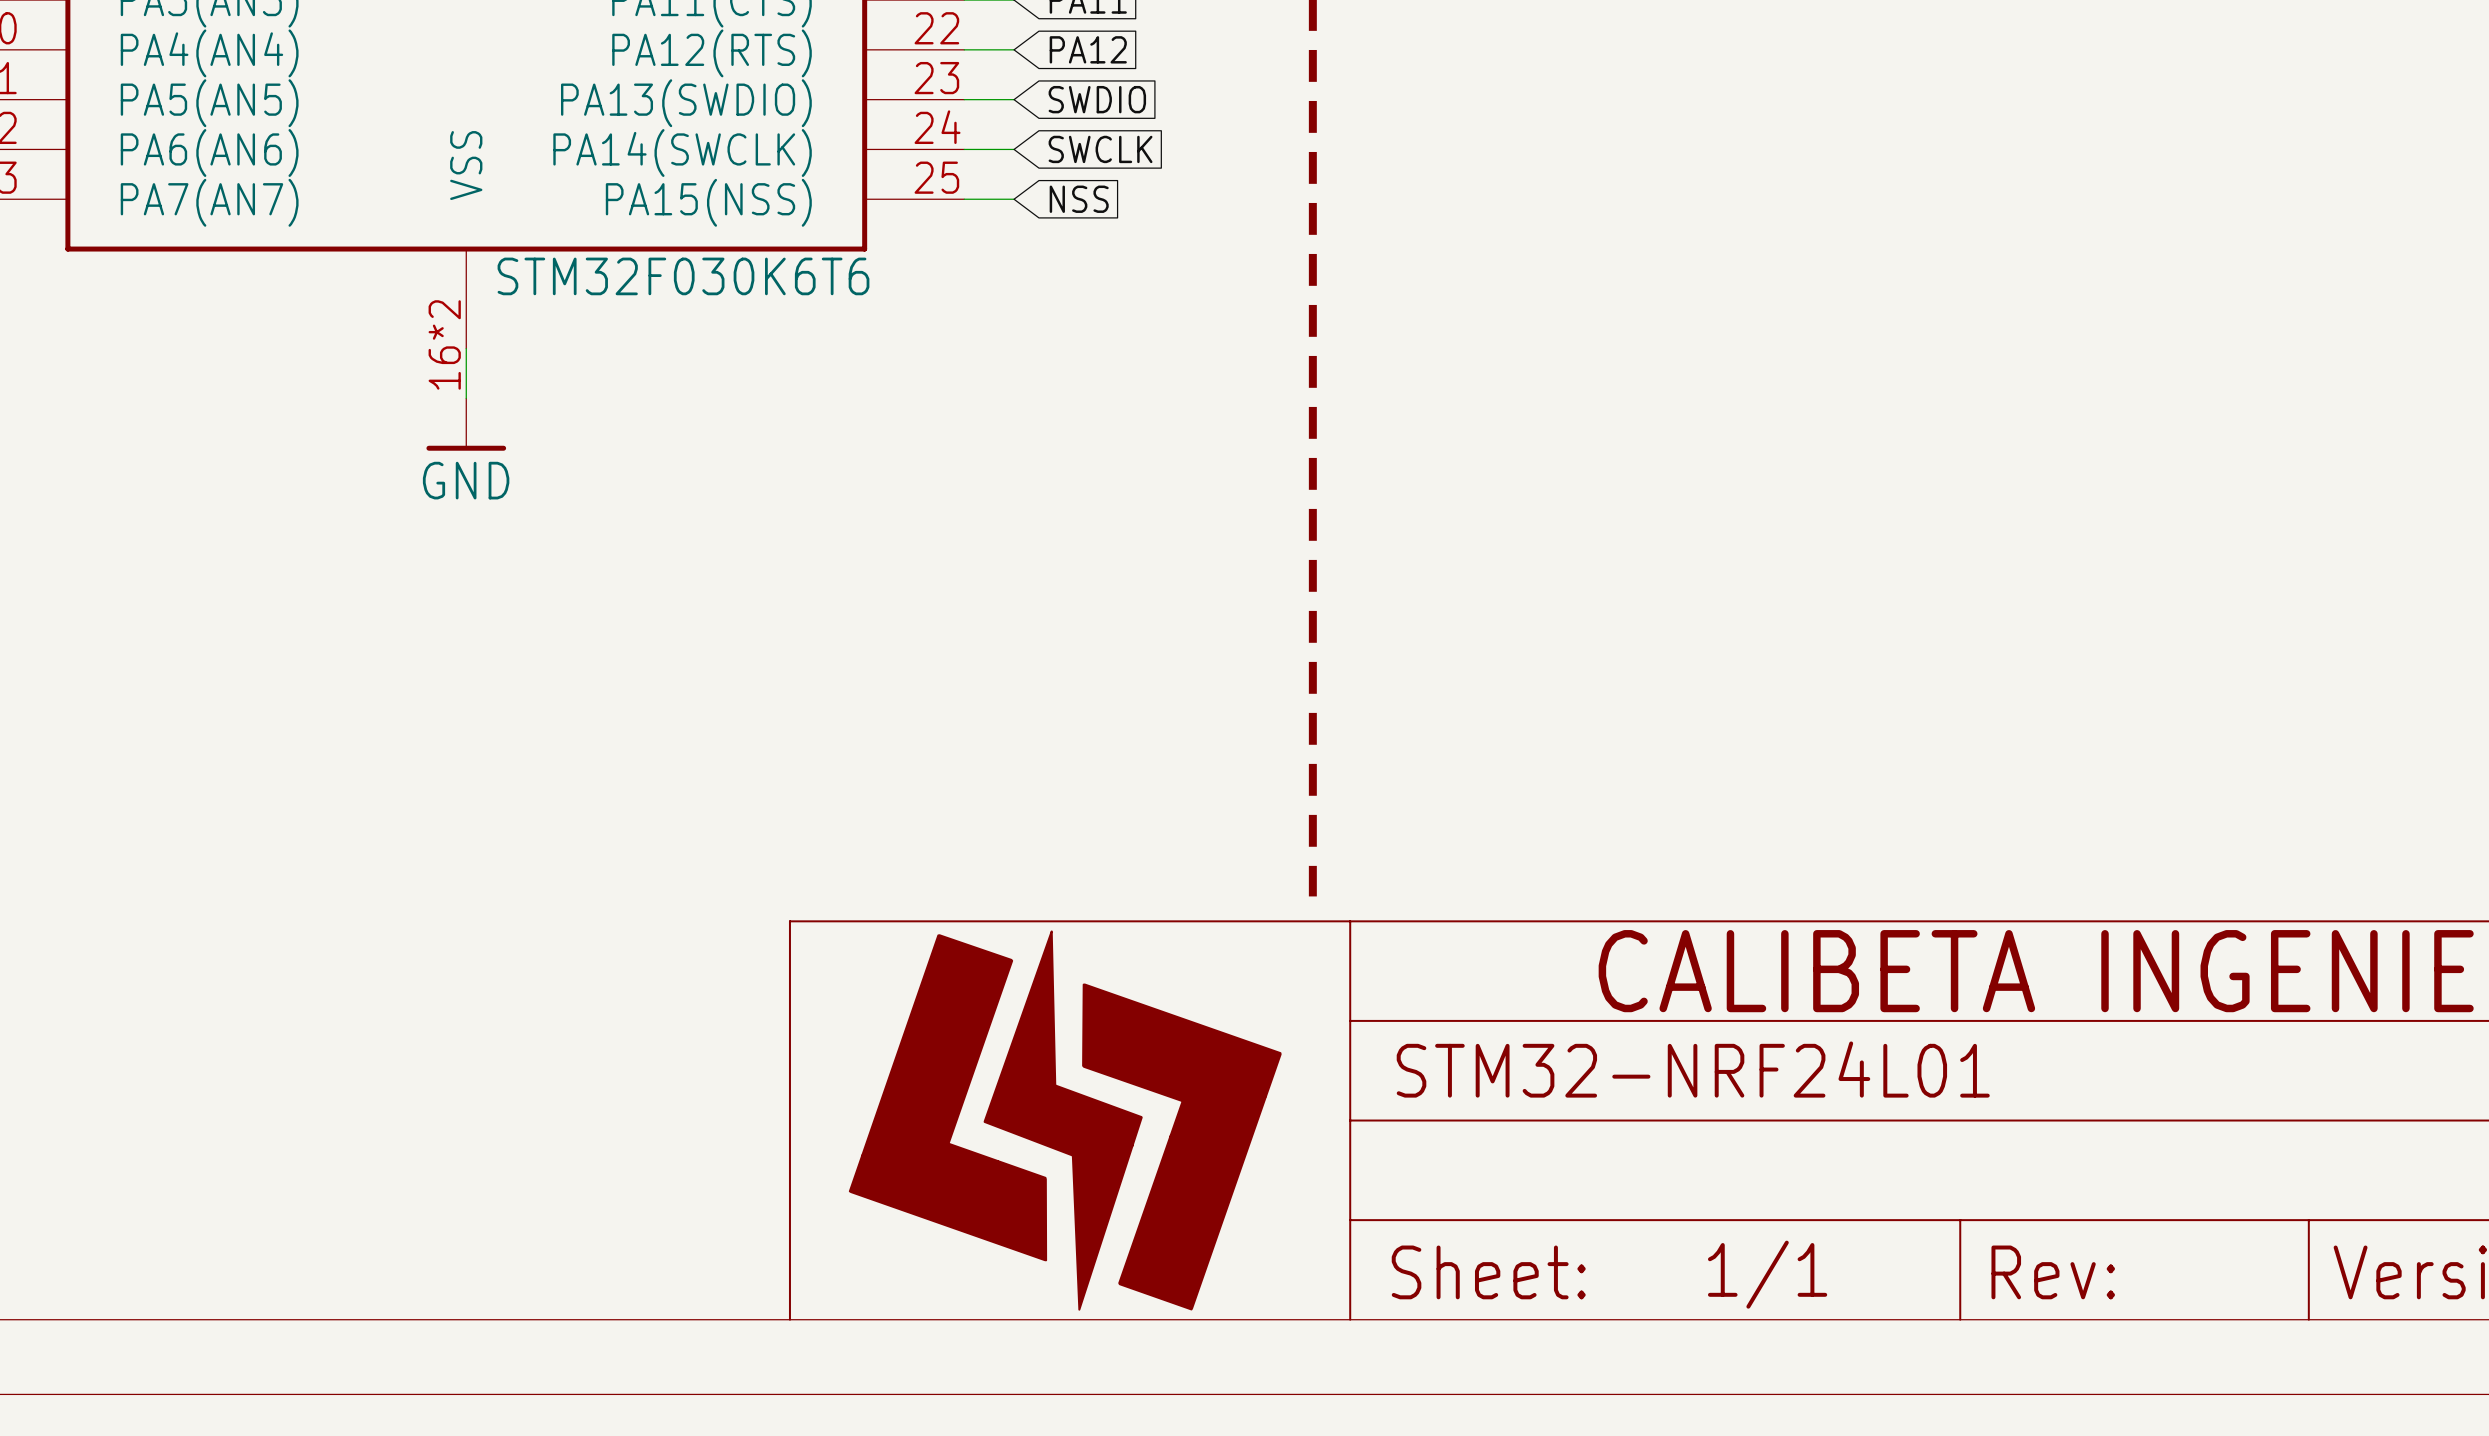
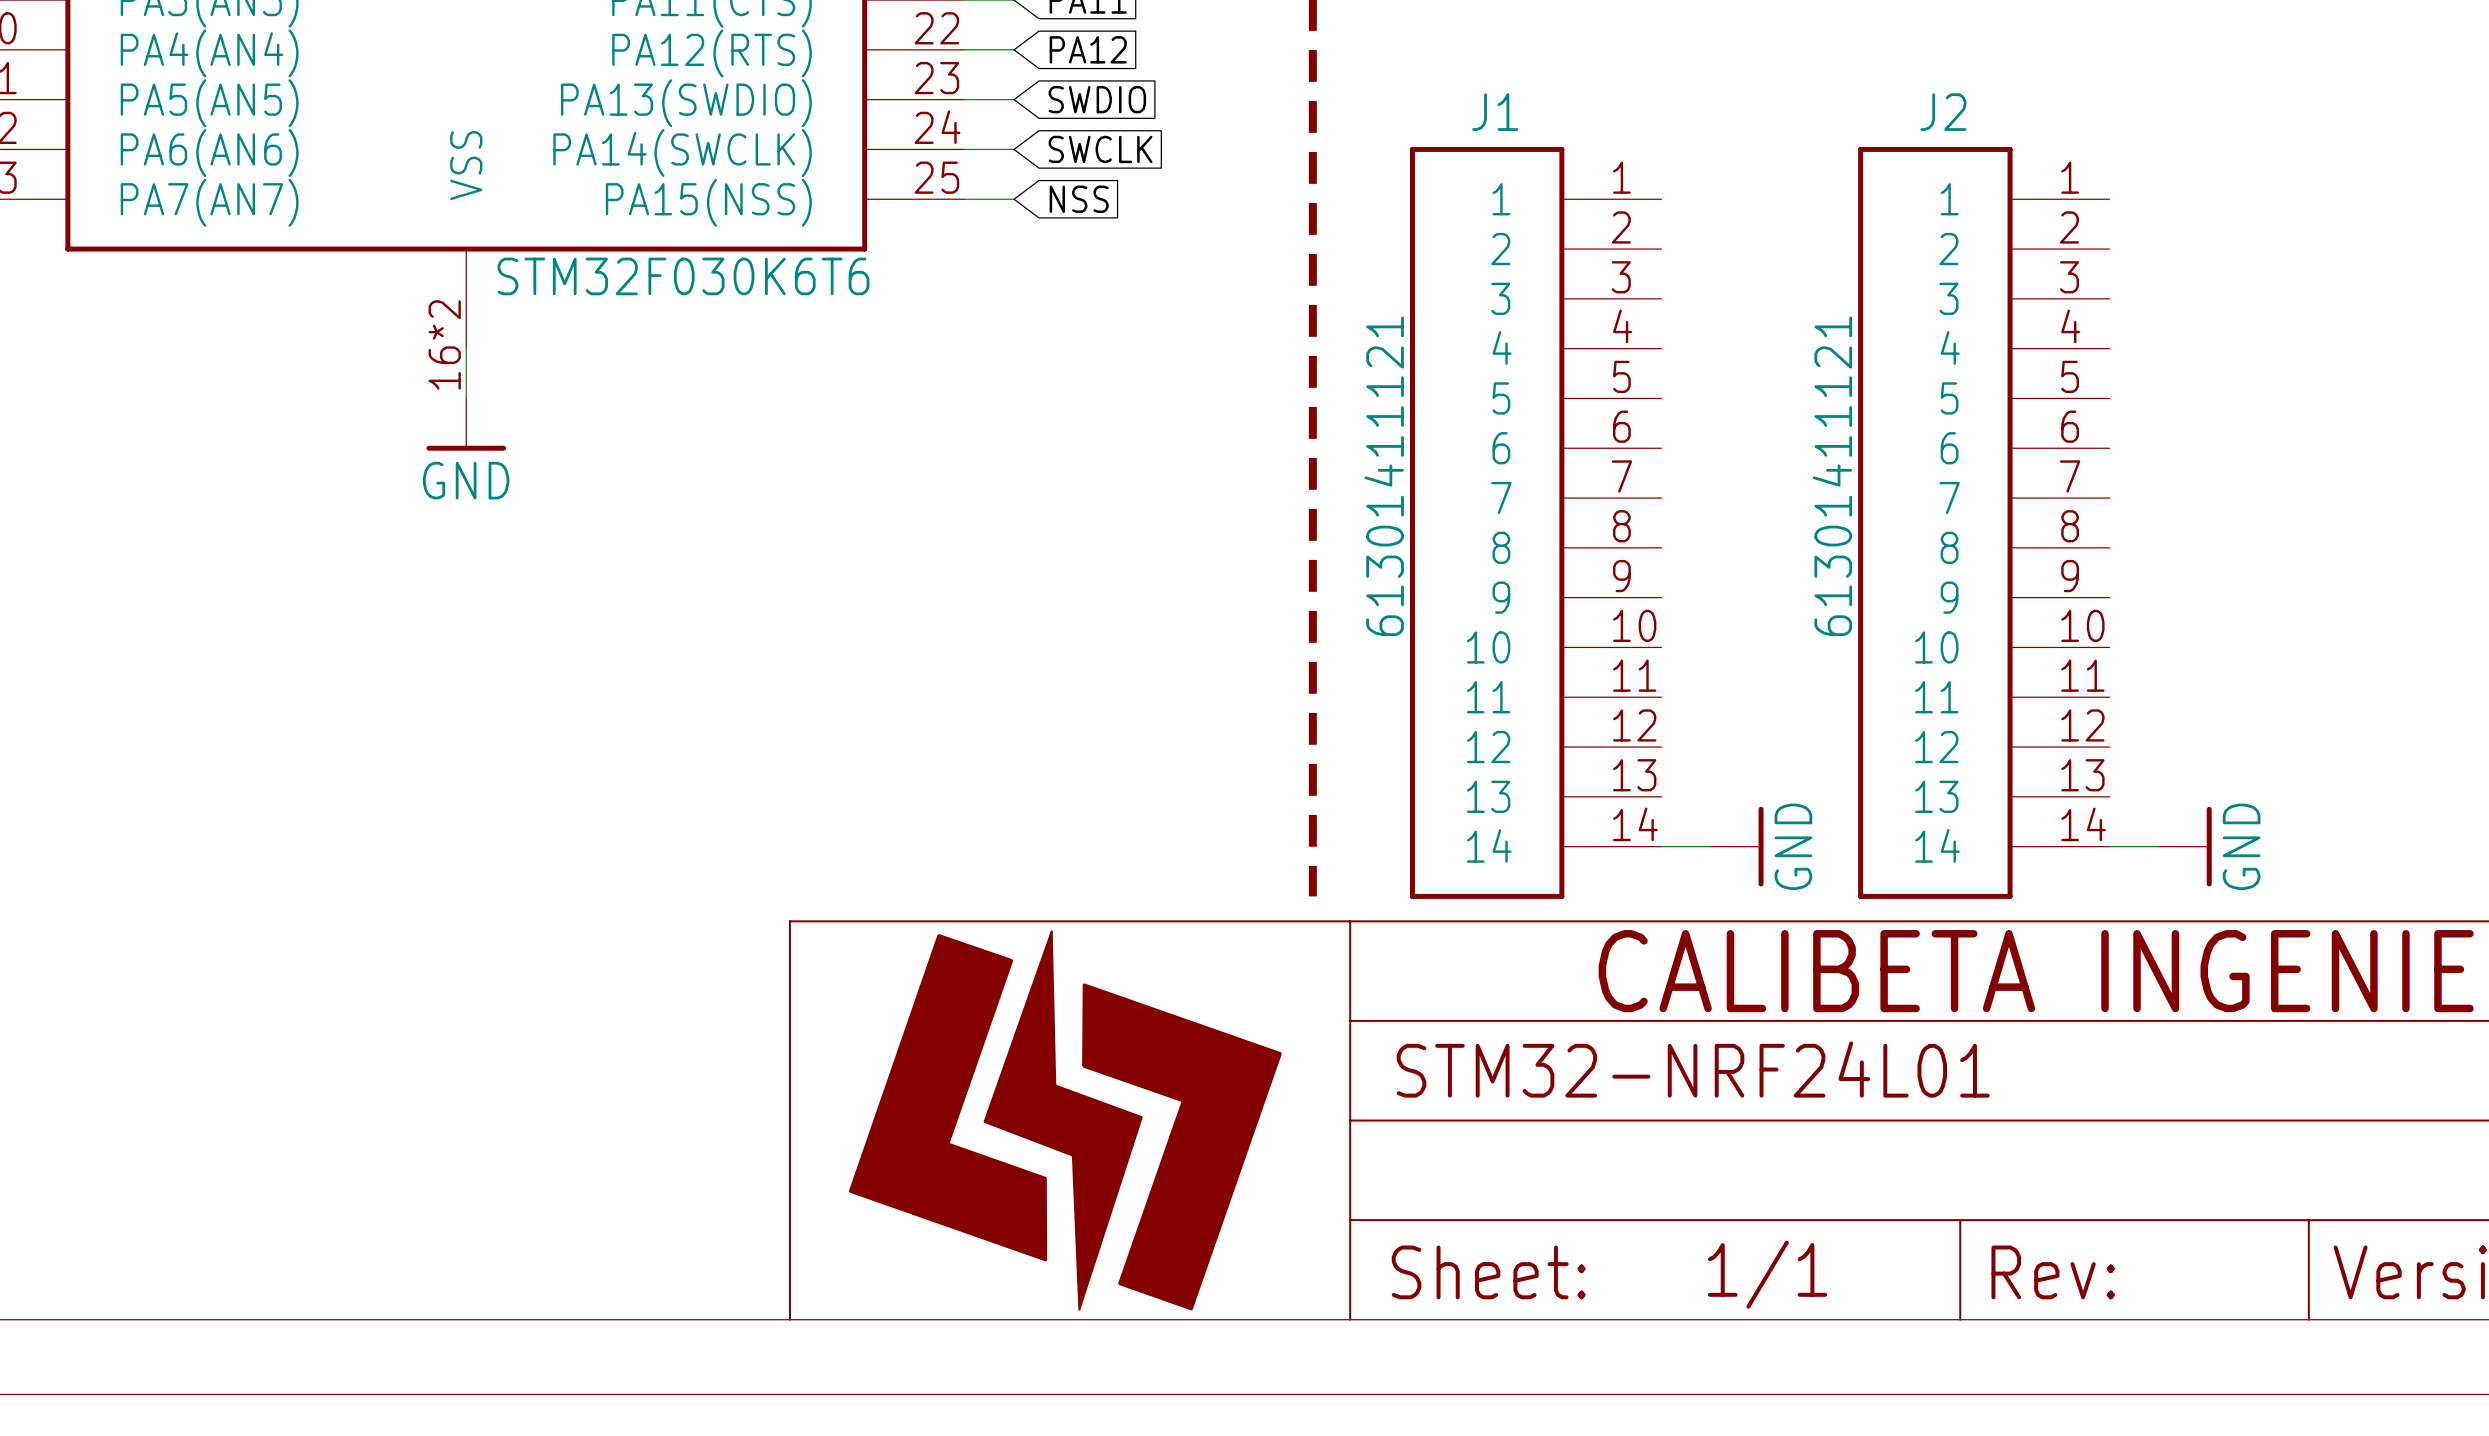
J1: none -> 61301411121 (1535, 522)
J2: none -> 61301411121 (1983, 522)
wire: none -> (1661, 846) (1711, 846)
power symbol: none -> GND (1737, 846)
wire: none -> (2109, 846) (2159, 846)
power symbol: none -> GND (2185, 846)

